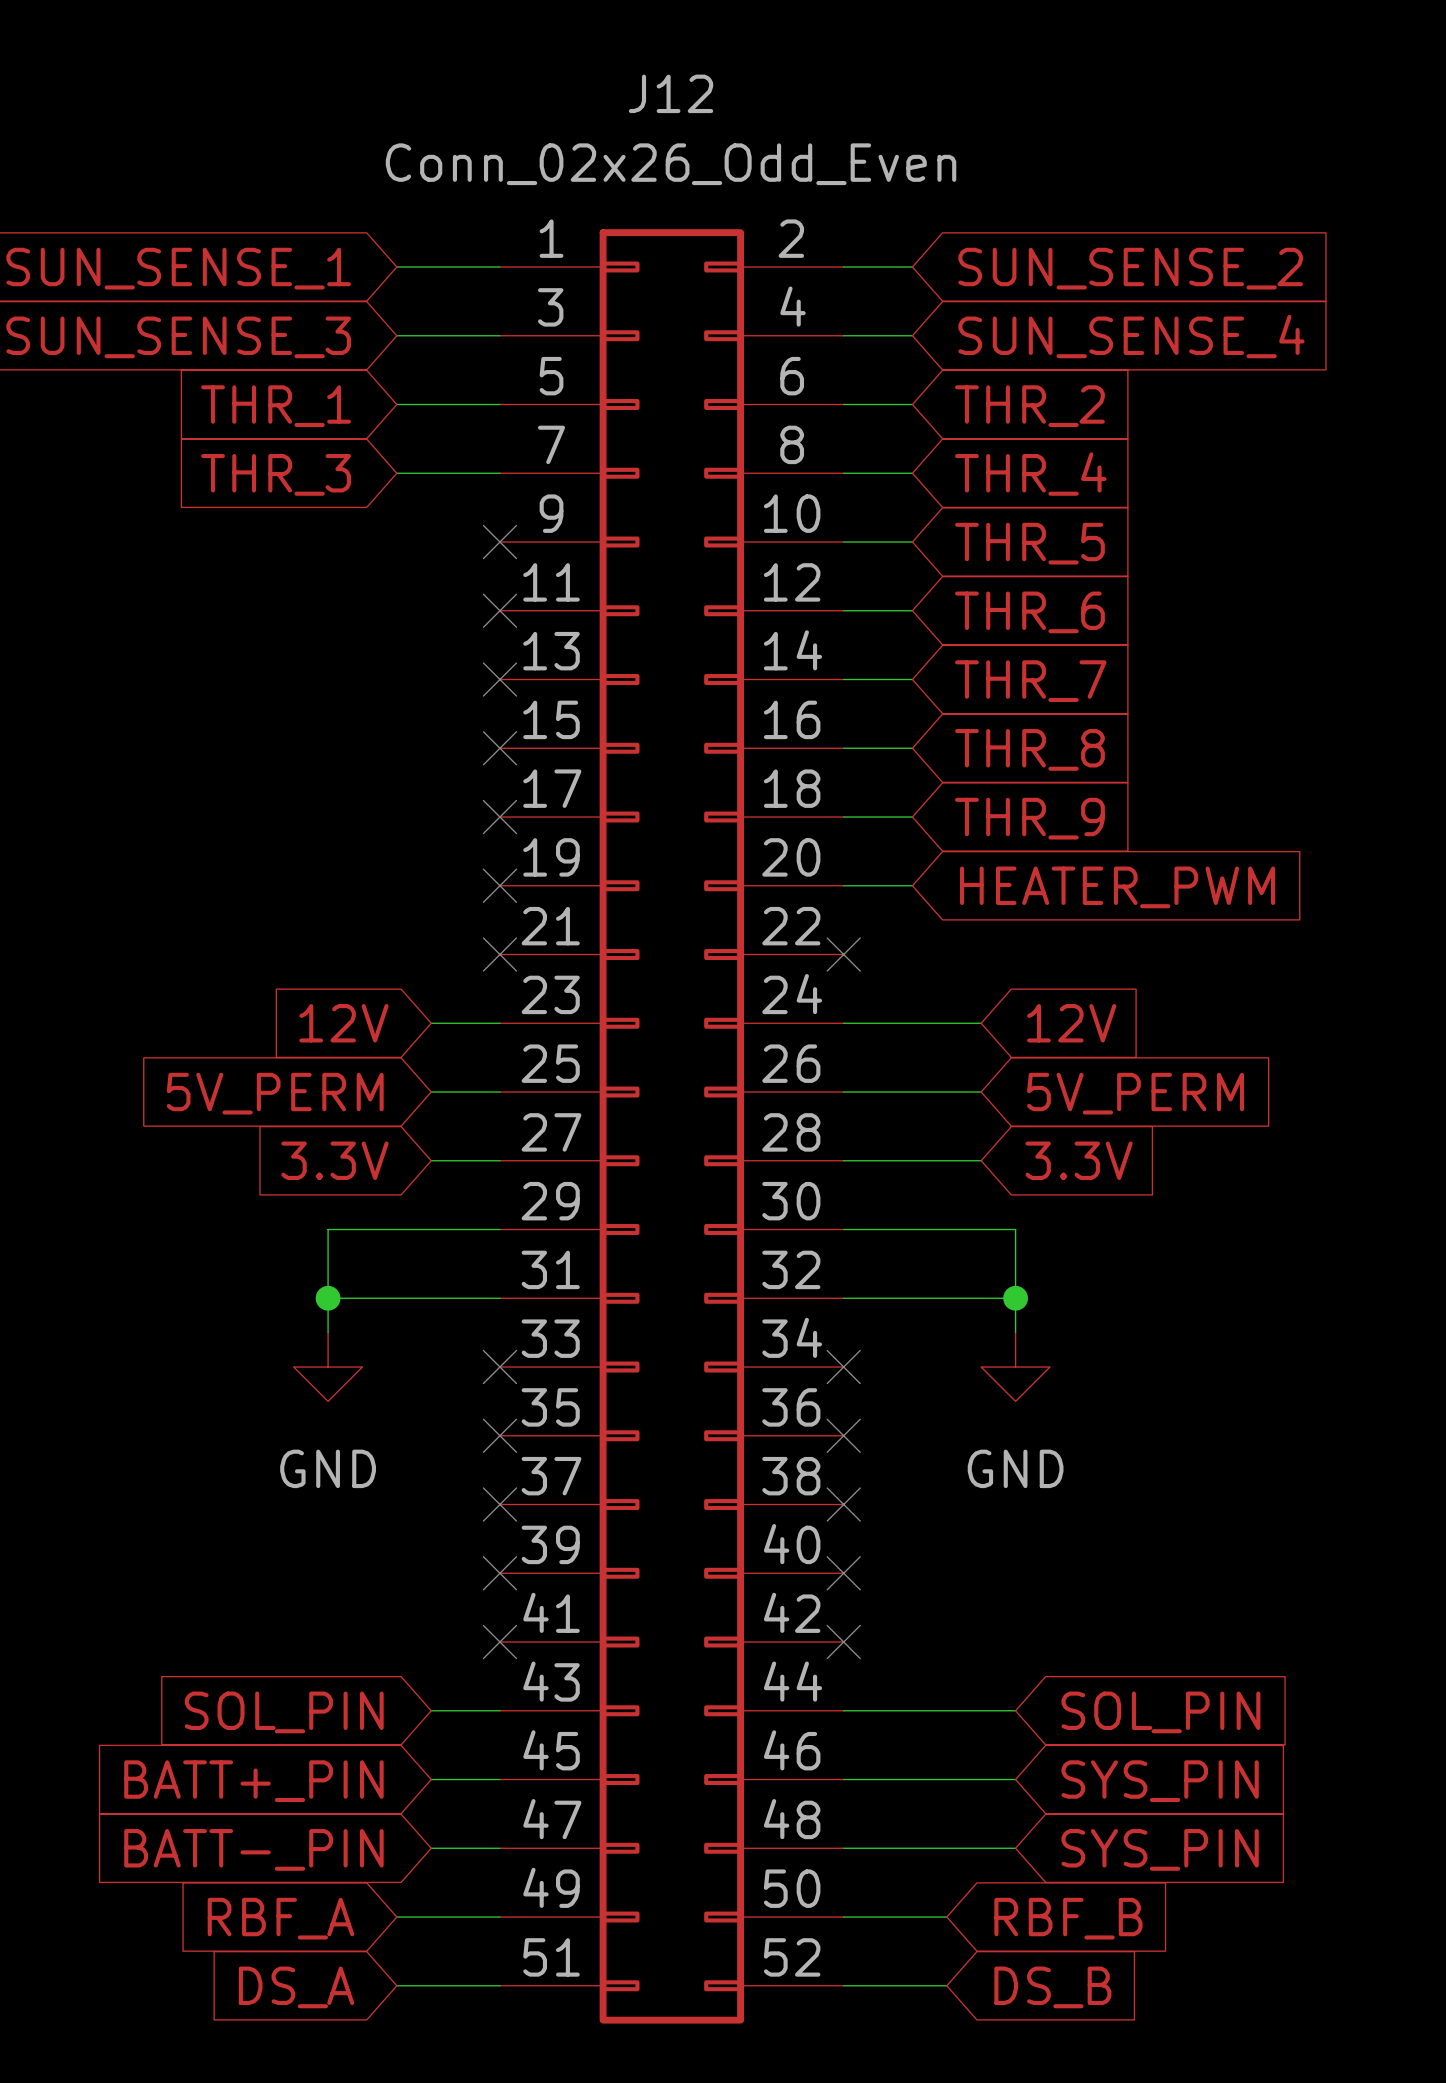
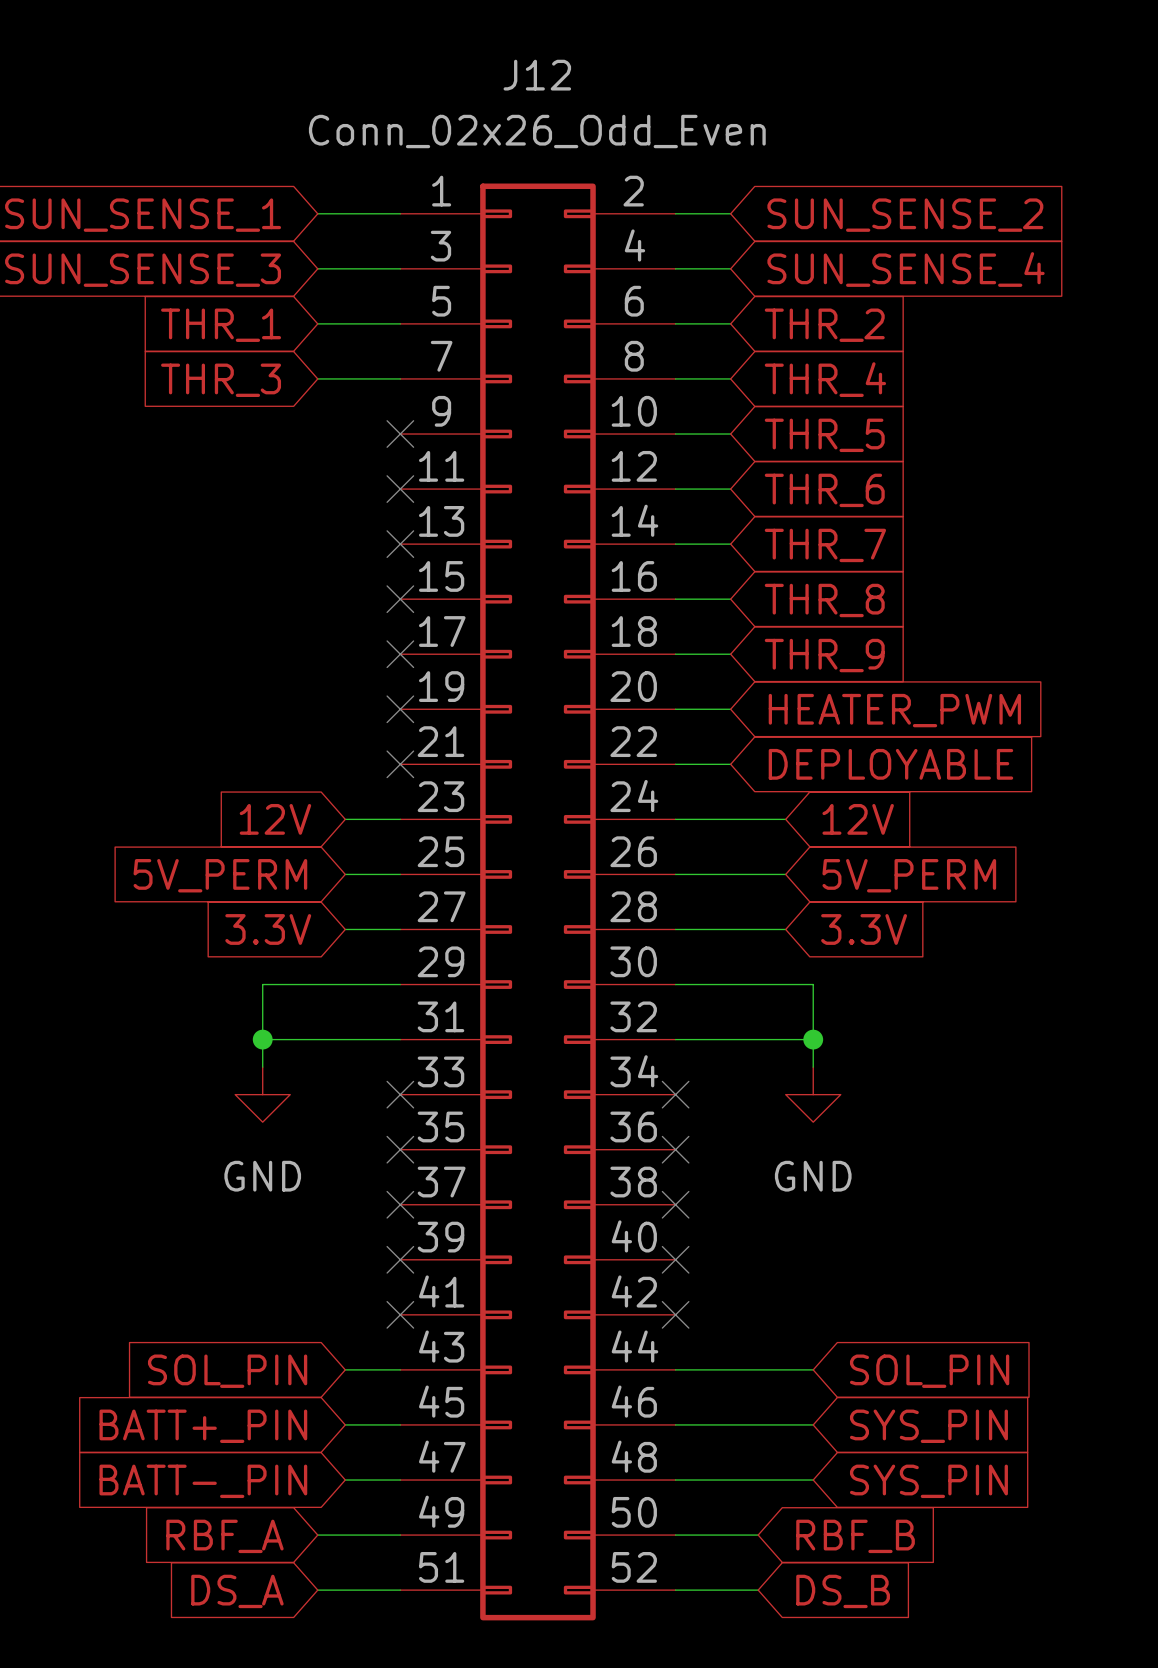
wire: none -> (675, 764) (730, 764)
no-connect mark: (843, 954) -> none
global label: none -> DEPLOYABLE (890, 764)

